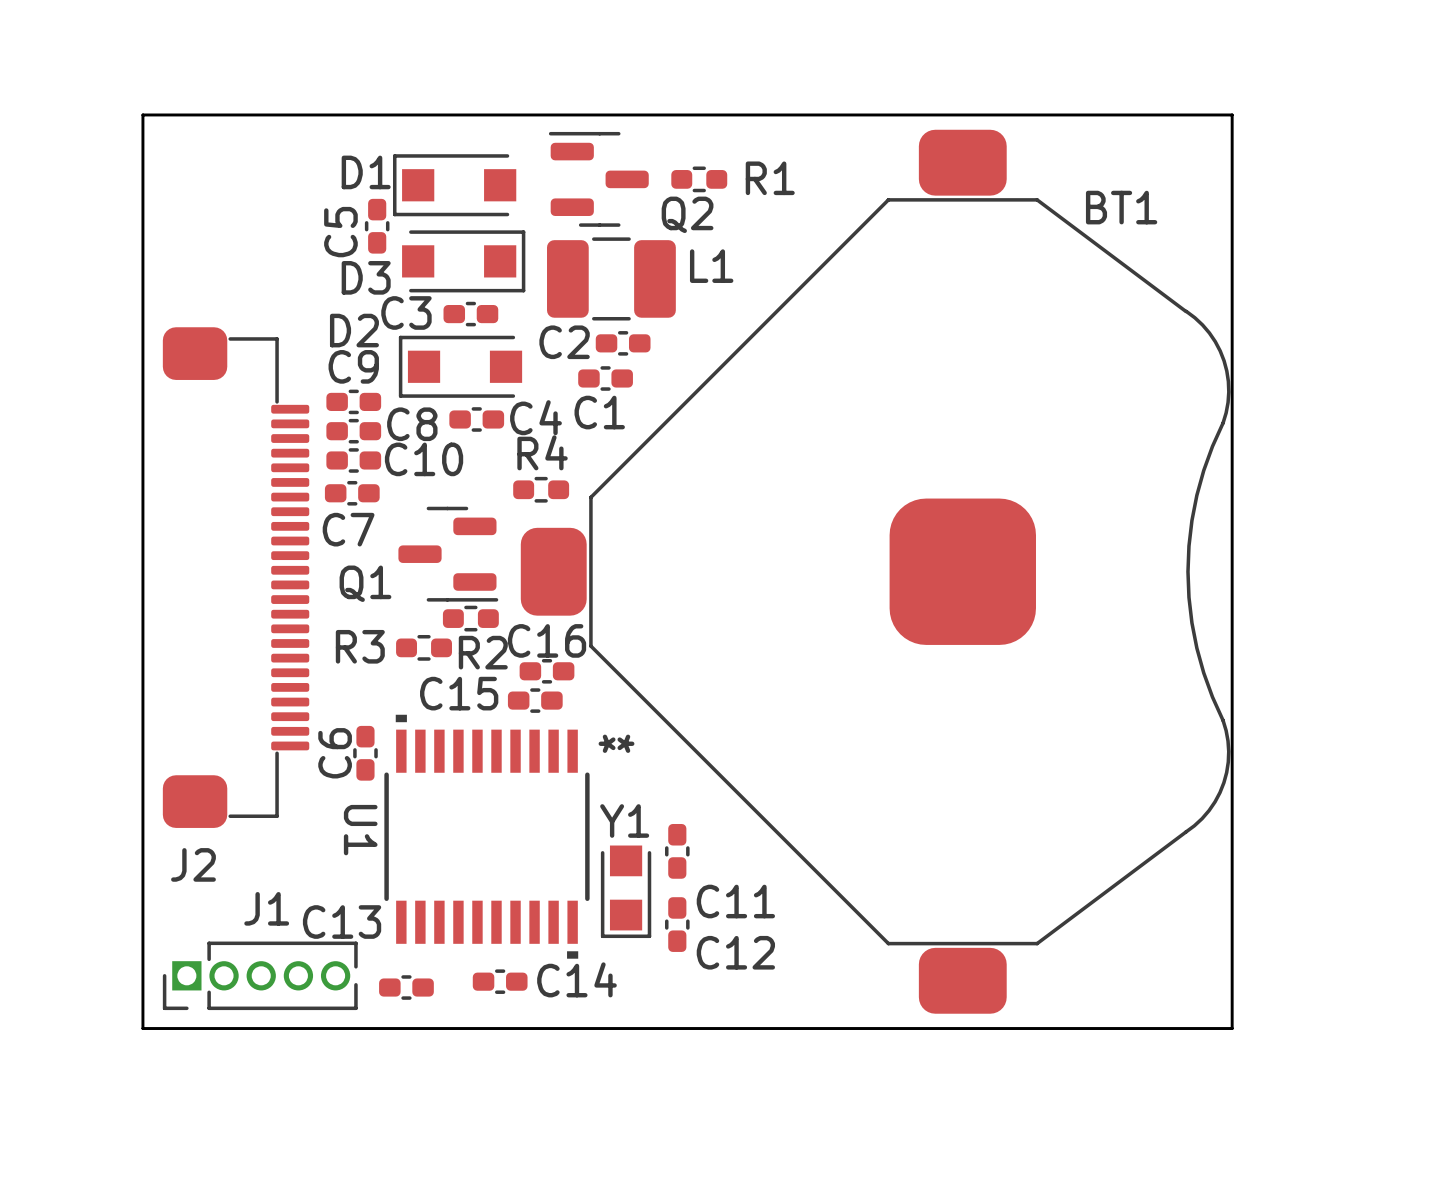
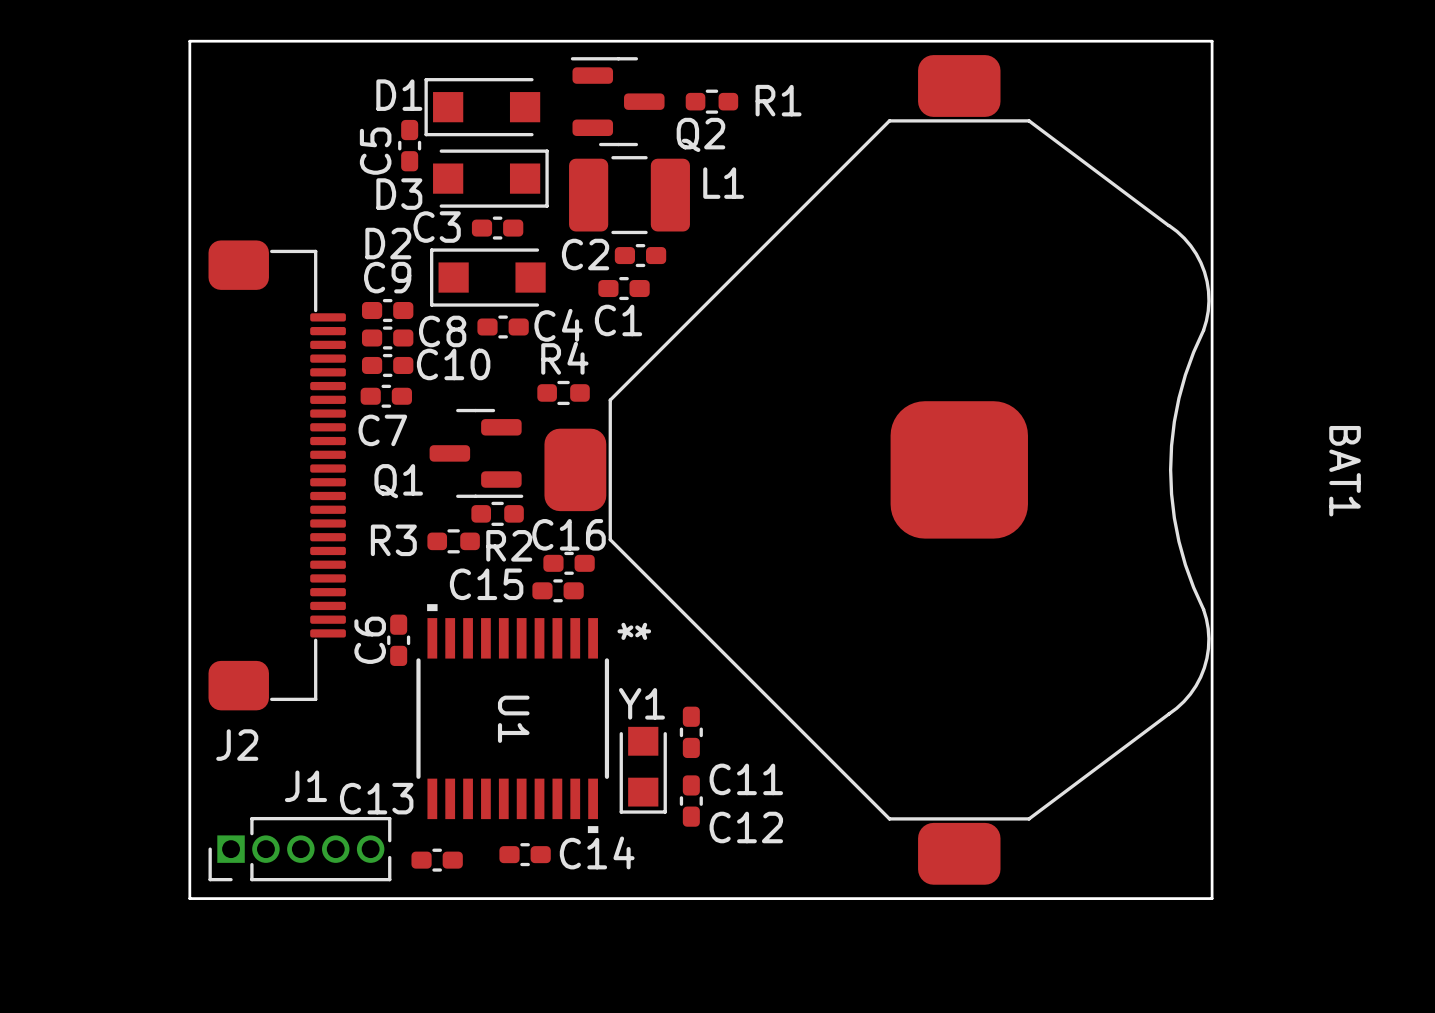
BT1 name: BT1 (1121, 207) -> BAT1 (1345, 471)
U1 name position: U1 (360, 830) -> U1 (513, 719)

